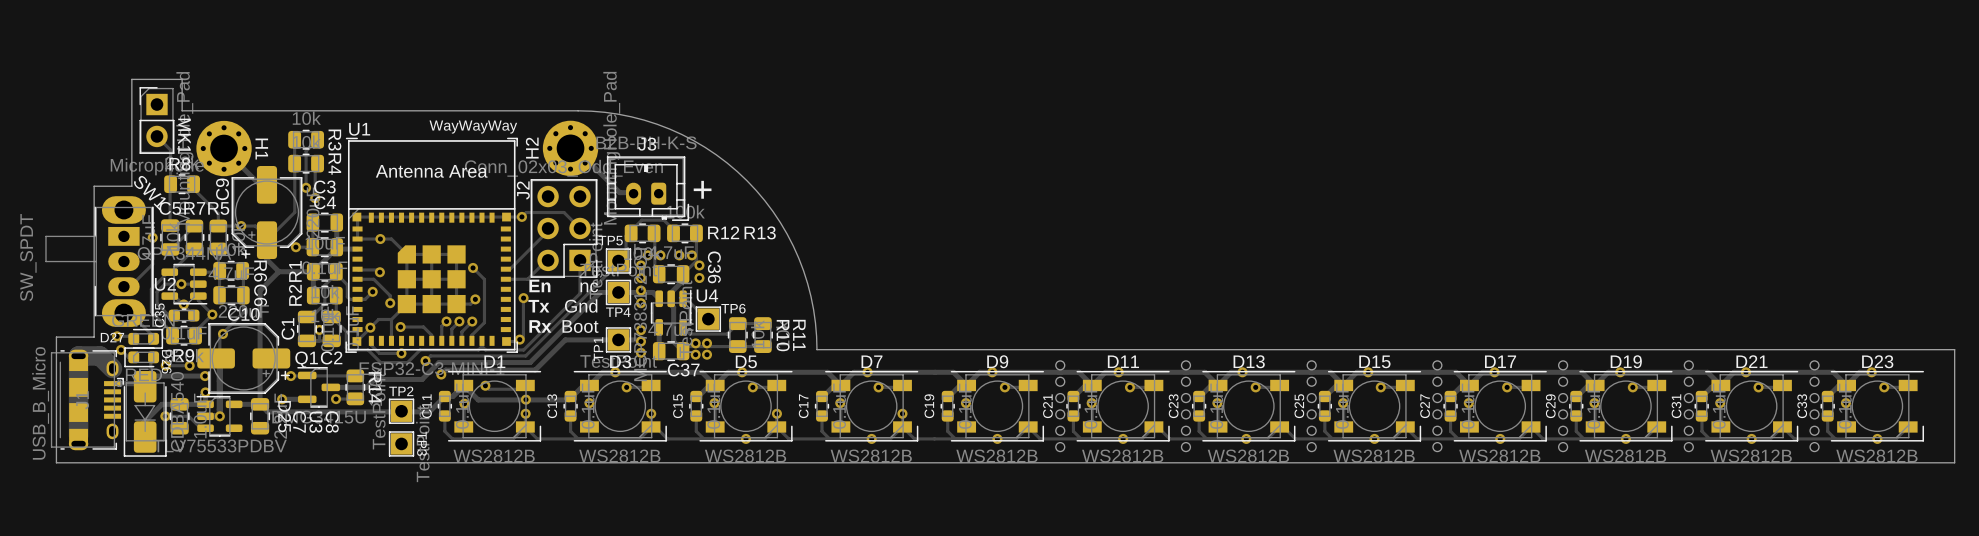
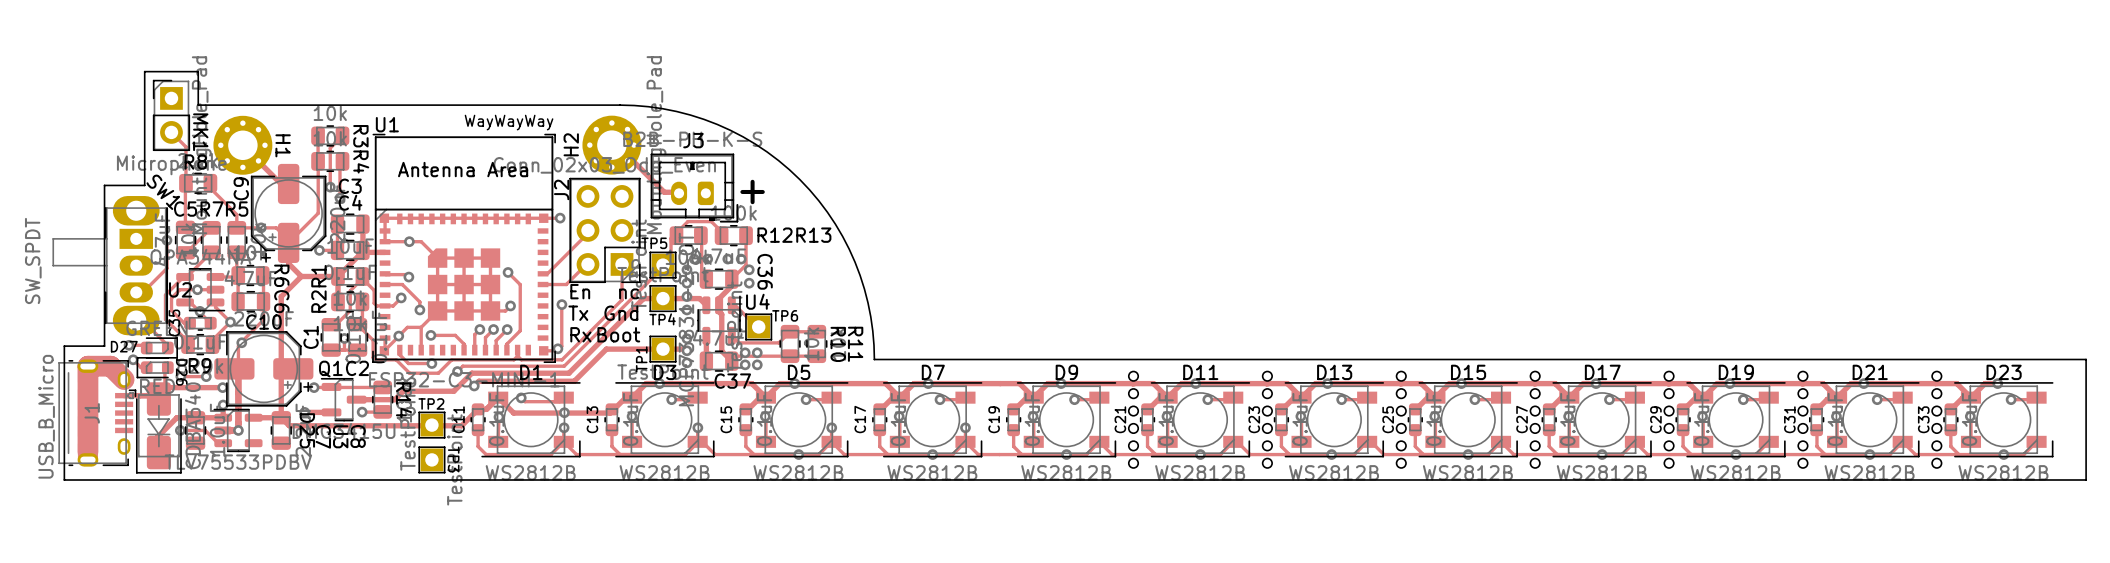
track: (521, 216) (526, 212) (564, 212) (580, 228) -> none

